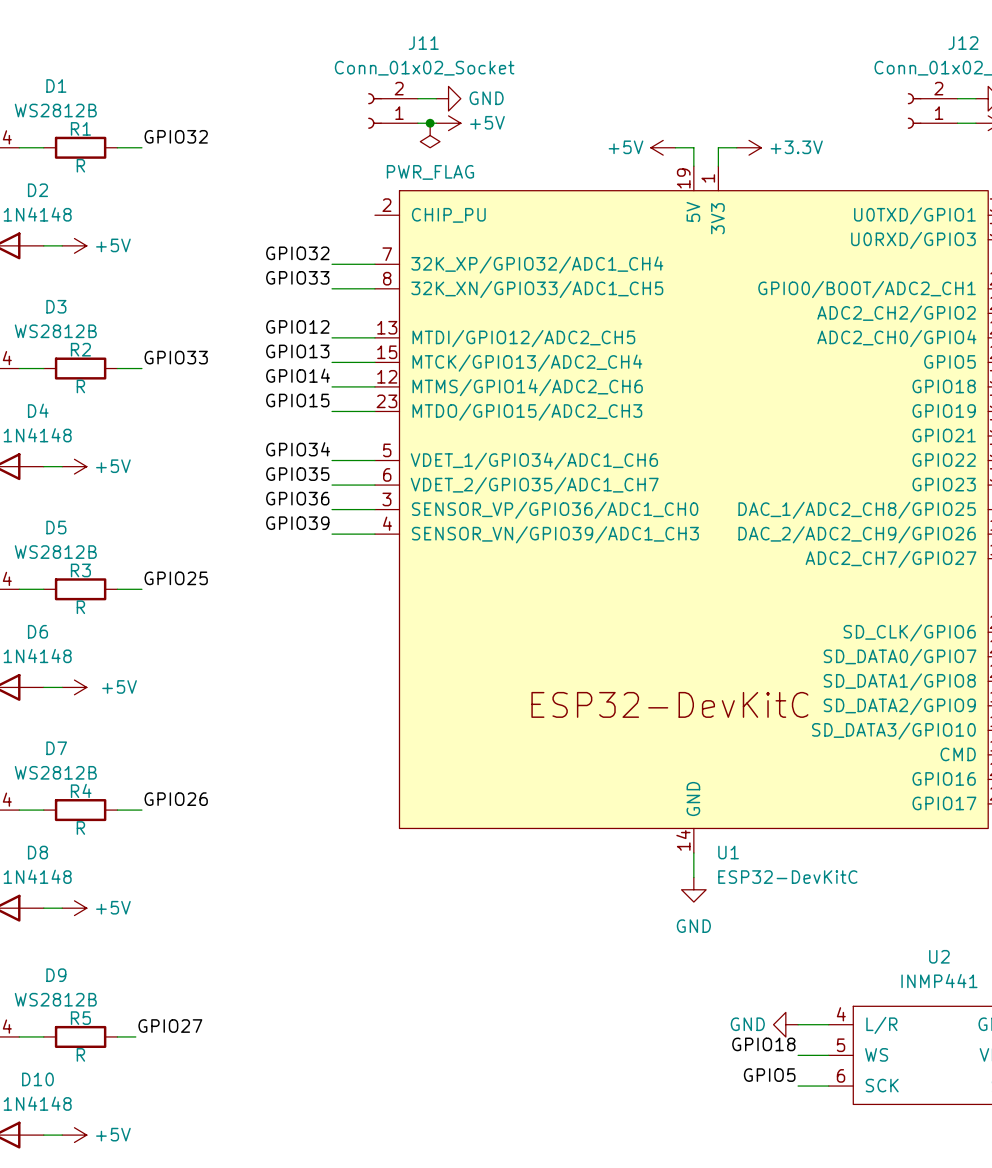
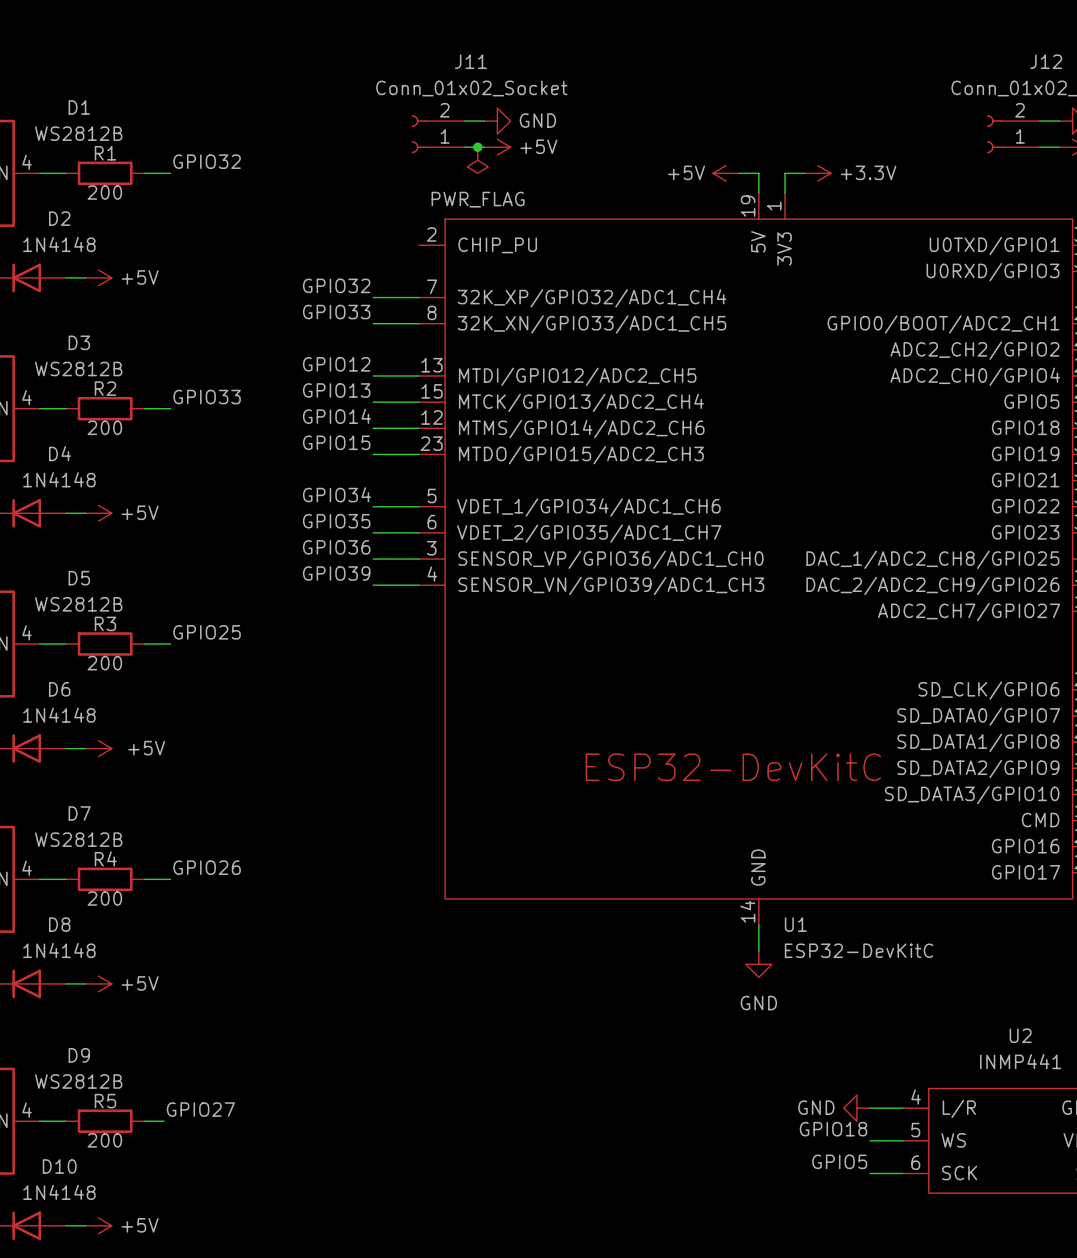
R1 value: R (80, 165) -> 200 (104, 192)
R2 value: R (80, 386) -> 200 (104, 427)
R3 value: R (80, 607) -> 200 (104, 663)
R4 value: R (80, 828) -> 200 (104, 898)
R5 value: R (80, 1054) -> 200 (104, 1140)

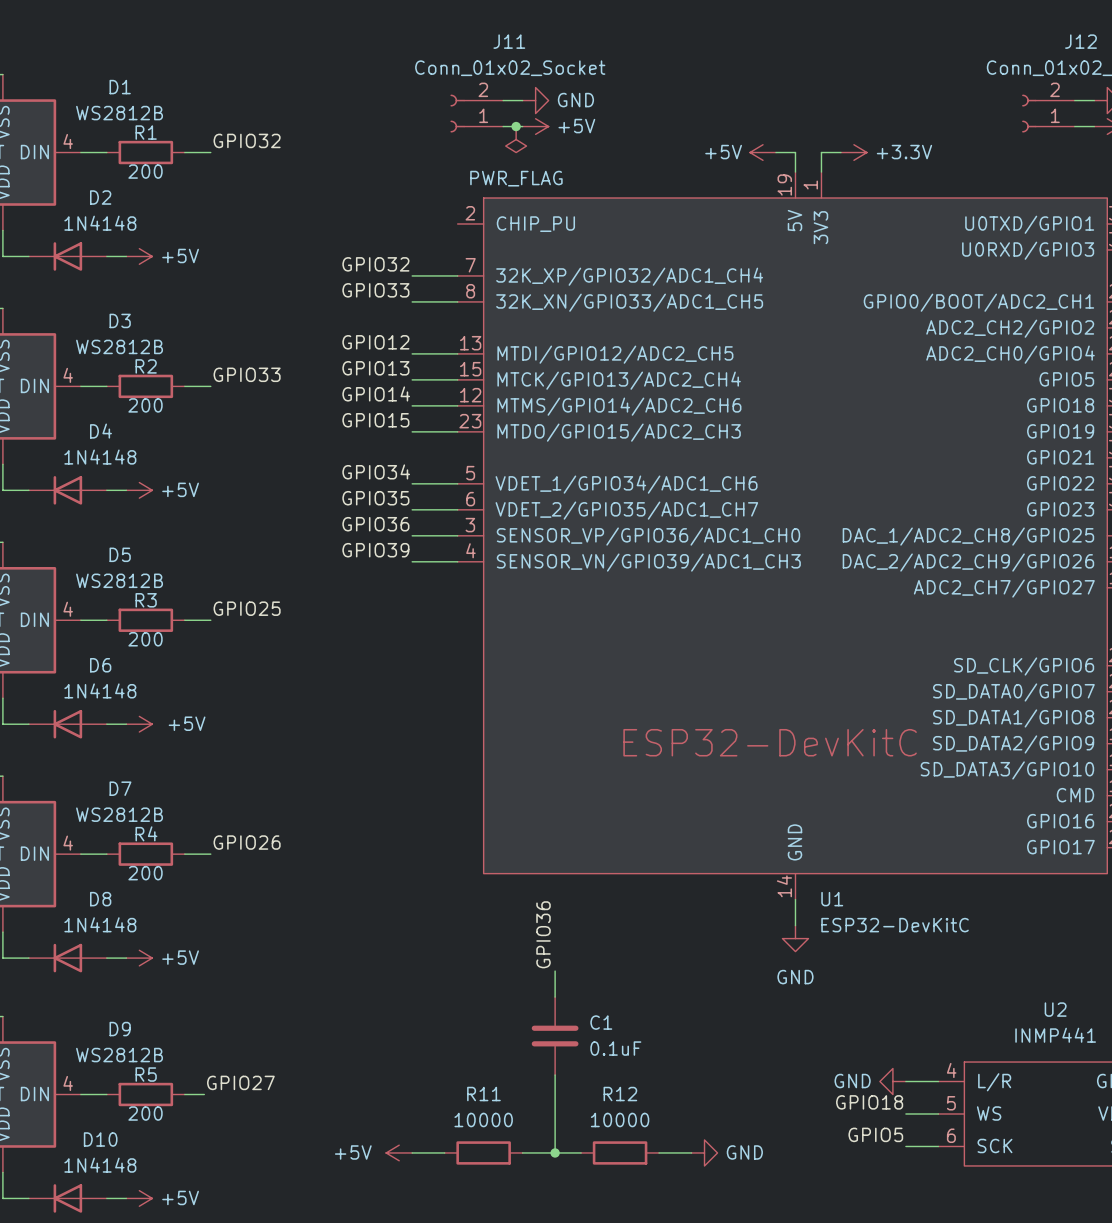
label: none -> GPIO36 (543, 934)
wire: none -> (555, 971) (555, 997)
C1: none -> 0.1uF (555, 1036)
wire: none -> (555, 1075) (555, 1152)
power symbol: none -> +5V (399, 1152)
wire: none -> (412, 1152) (444, 1152)
R11: none -> 10000 (483, 1152)
wire: none -> (522, 1152) (581, 1152)
junction: none -> (555, 1152)
R12: none -> 10000 (620, 1152)
wire: none -> (659, 1152) (691, 1152)
power symbol: none -> GND (704, 1152)

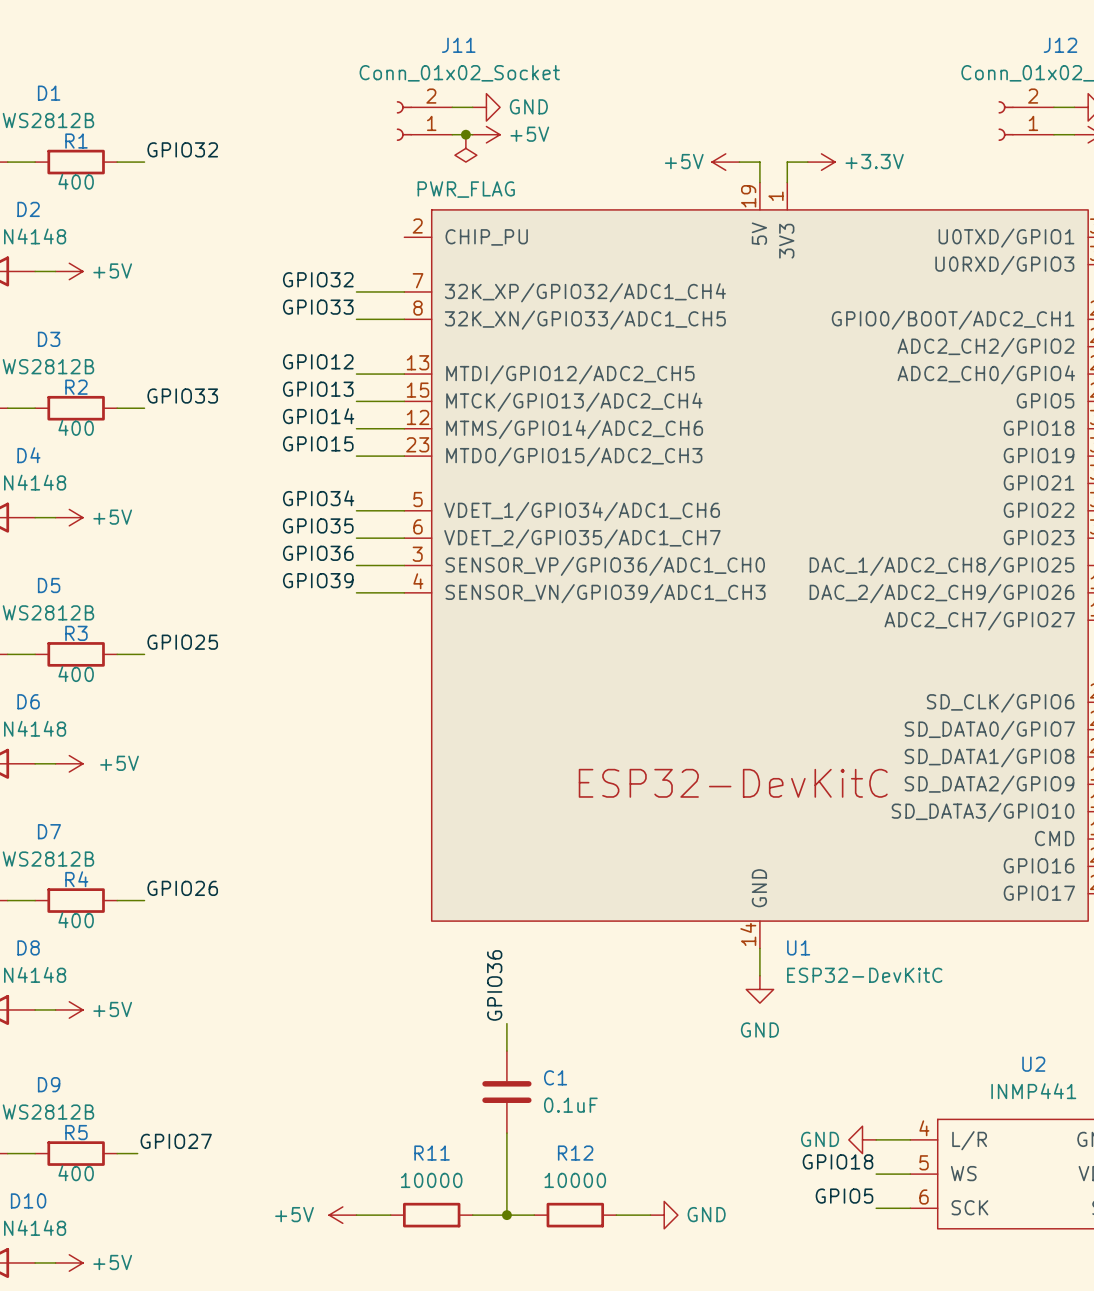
R1 value: 200 (145, 171) -> 400 (76, 181)
R2 value: 200 (145, 405) -> 400 (76, 427)
R3 value: 200 (145, 639) -> 400 (76, 674)
R4 value: 200 (145, 873) -> 400 (76, 920)
R5 value: 200 (145, 1113) -> 400 (76, 1173)

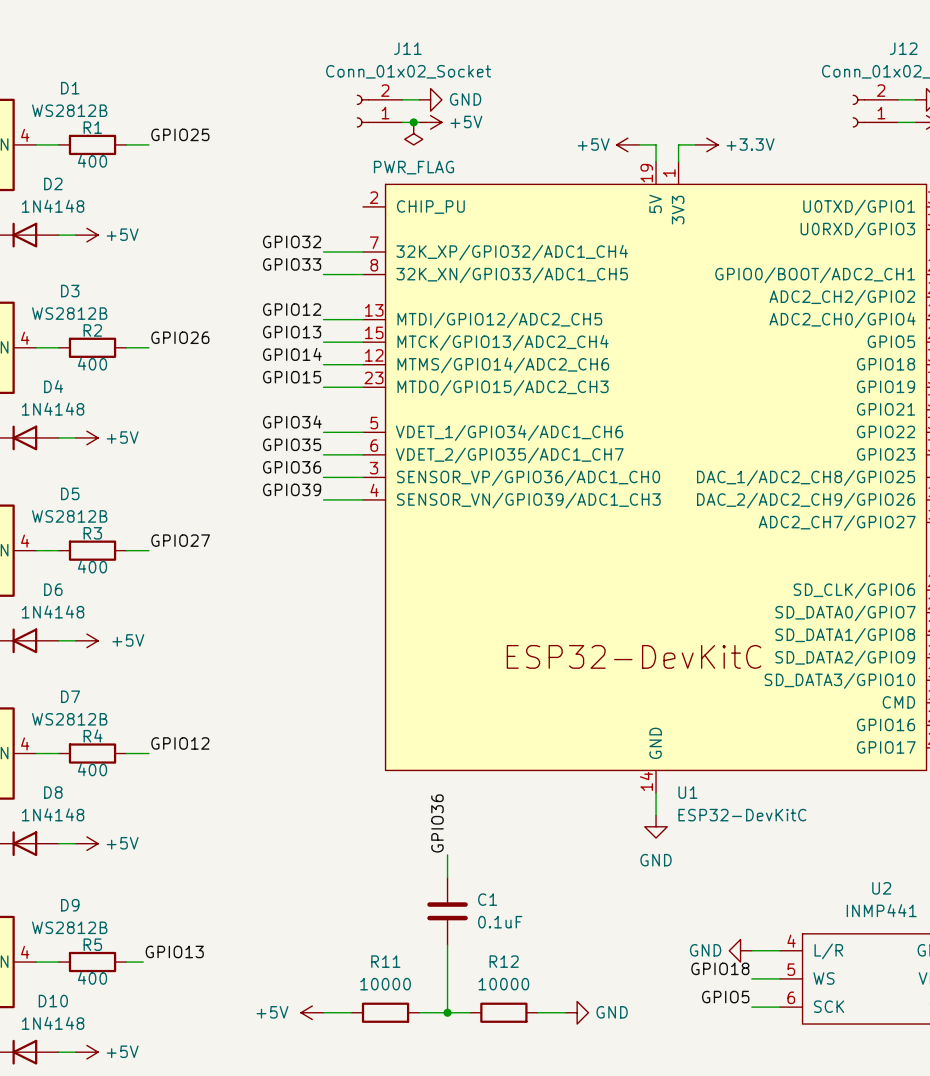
label: GPIO32 (182, 149) -> GPIO25 (180, 134)
label: GPIO33 (182, 396) -> GPIO26 (180, 337)
label: GPIO25 (182, 642) -> GPIO27 (180, 540)
label: GPIO26 (182, 888) -> GPIO12 (180, 743)
label: GPIO27 (176, 1141) -> GPIO13 (174, 951)

